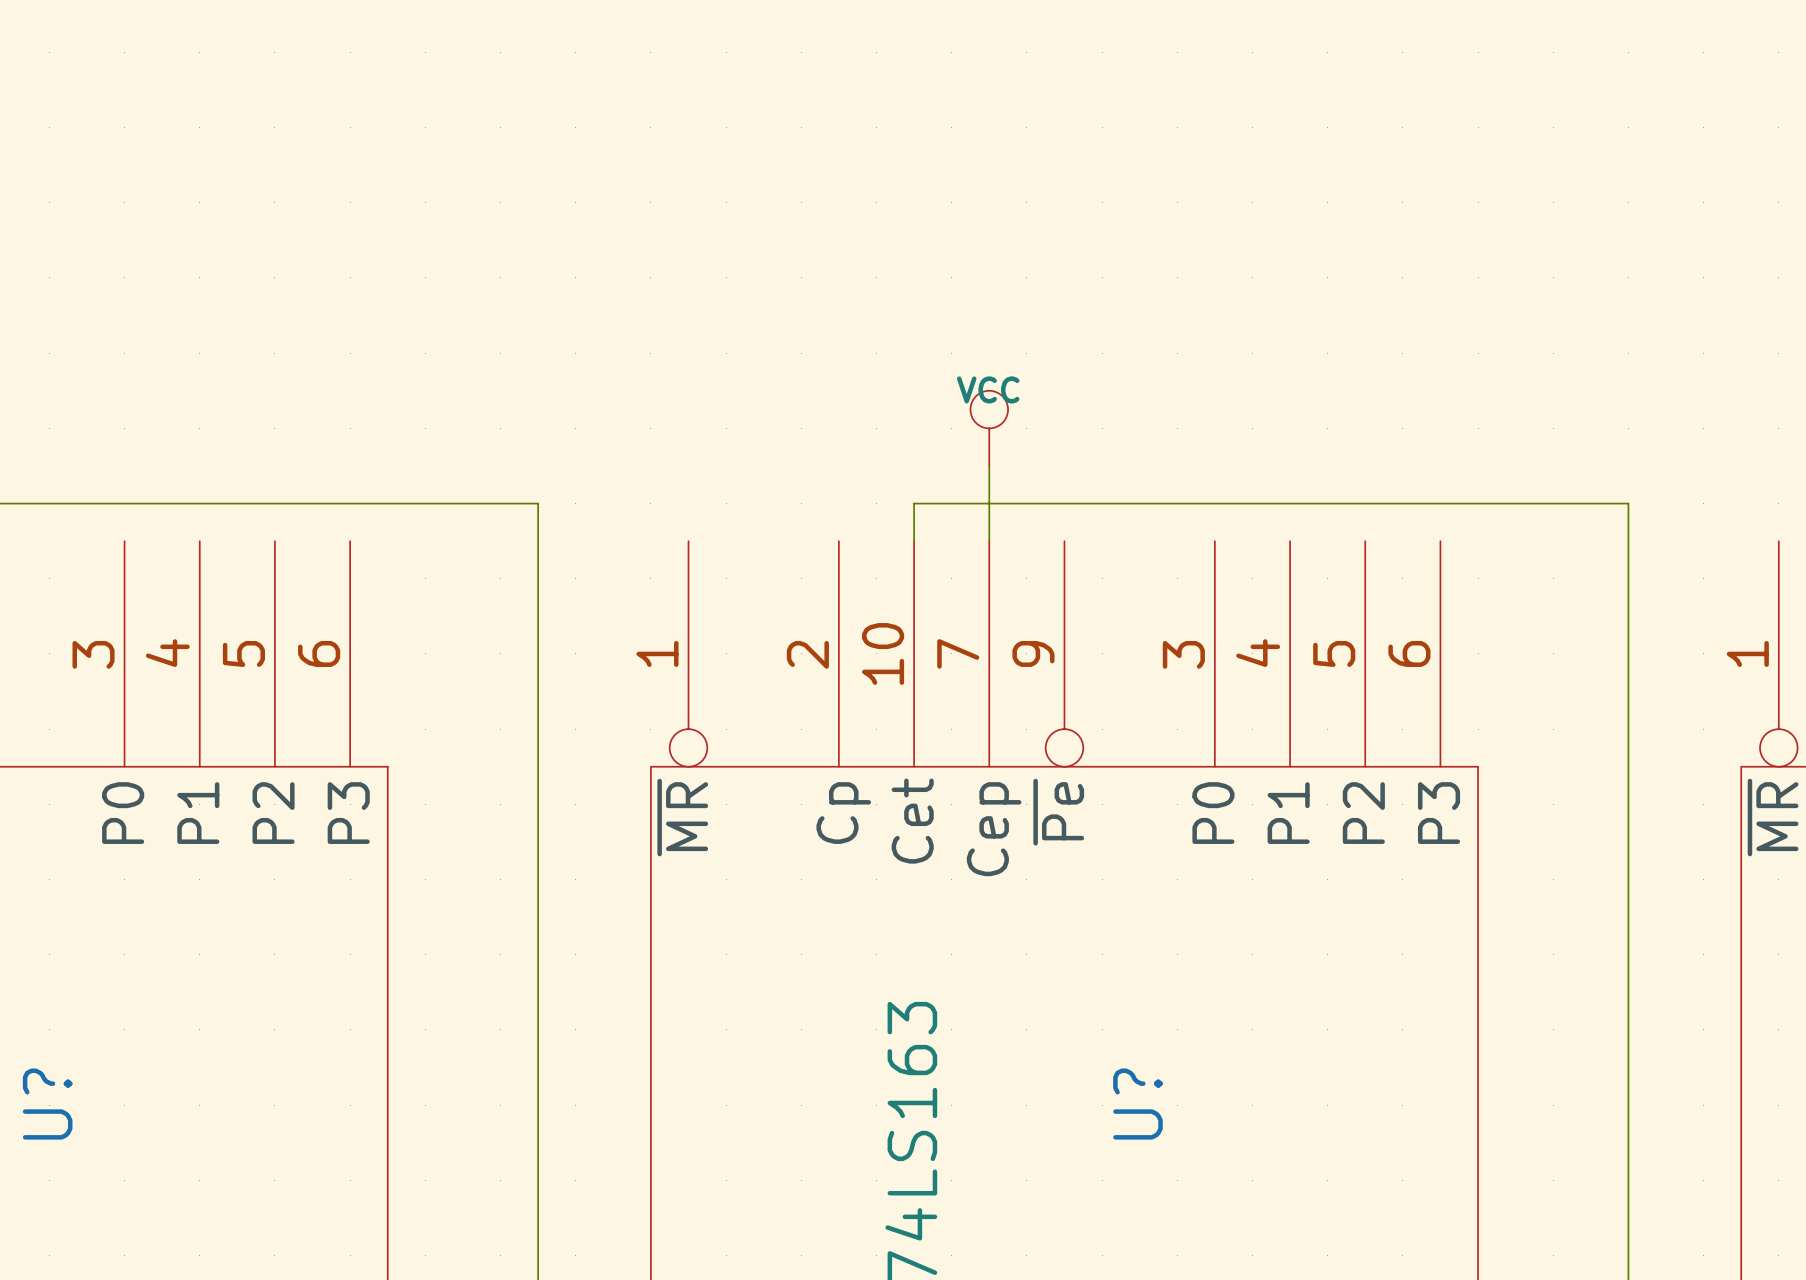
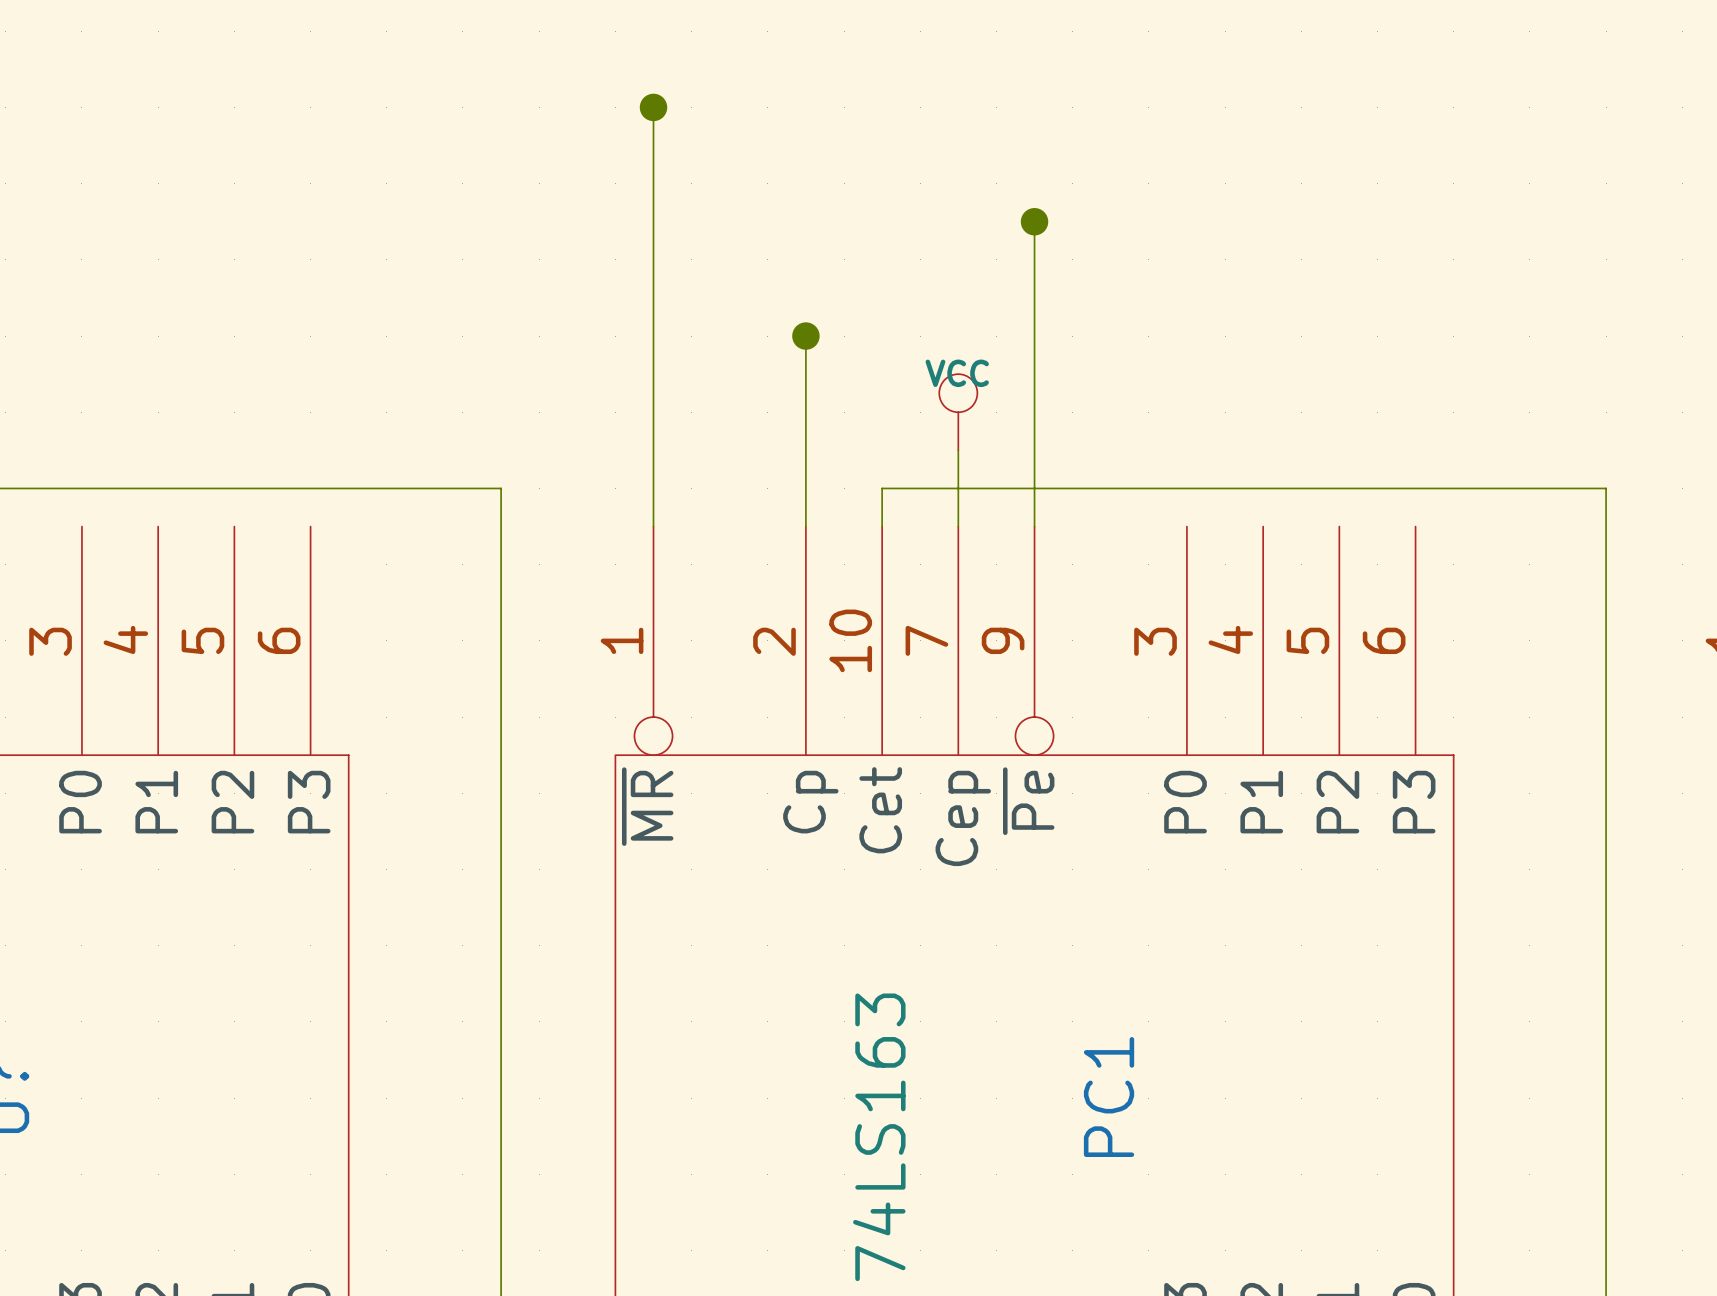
wire: none -> (653, 107) (653, 526)
junction: none -> (653, 107)
wire: none -> (1034, 221) (1034, 526)
junction: none -> (1034, 221)
wire: none -> (805, 336) (805, 526)
junction: none -> (805, 336)
U? name: U? (1137, 1104) -> PC1 (1109, 1097)

